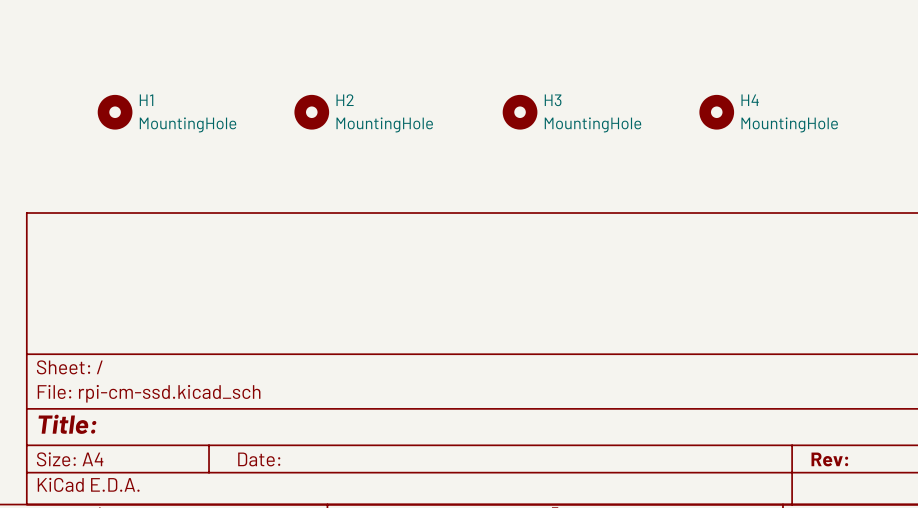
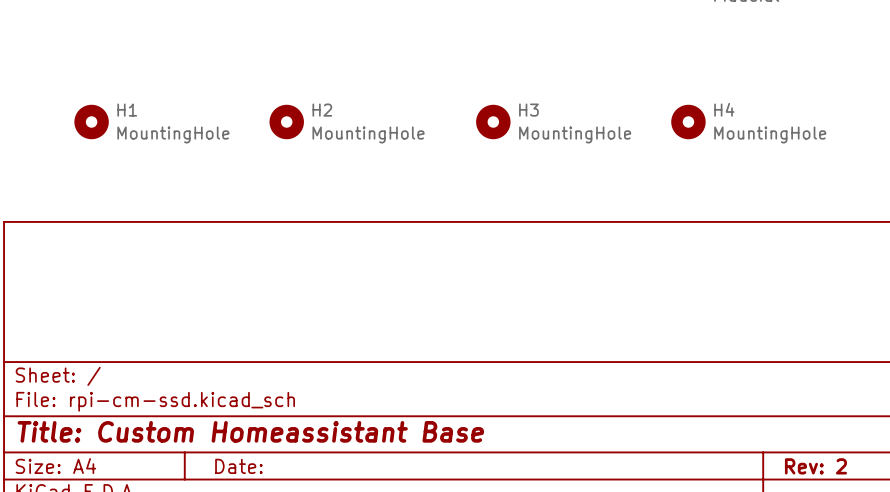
title block: Title: (67, 424) -> Title: Custom Homeassistant Base (250, 431)
title block: Rev: (829, 459) -> Rev: 2 (815, 466)

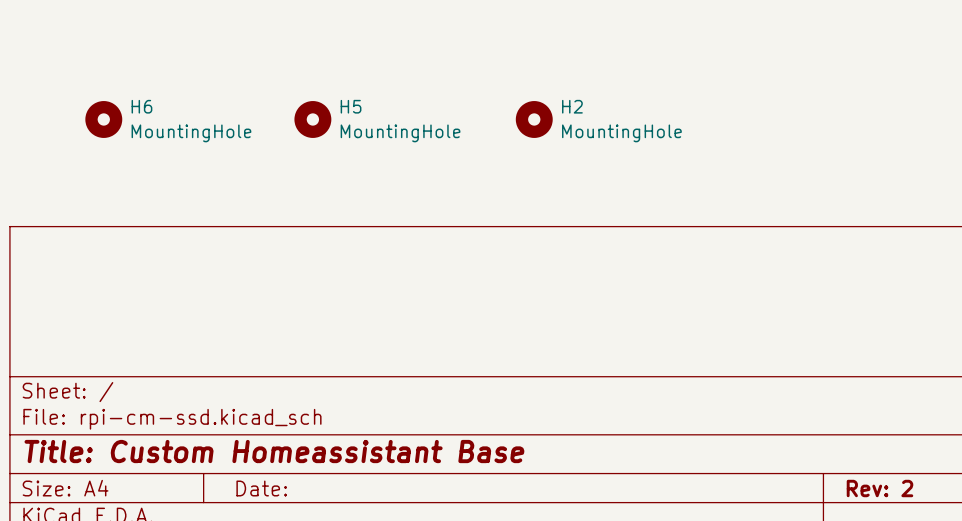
H1 name: H1 (127, 110) -> H6 (141, 106)
H2 name: H2 (322, 110) -> H5 (351, 106)
H3 name: H3 (528, 110) -> H2 (572, 106)
H4: MountingHole (688, 122) -> none

